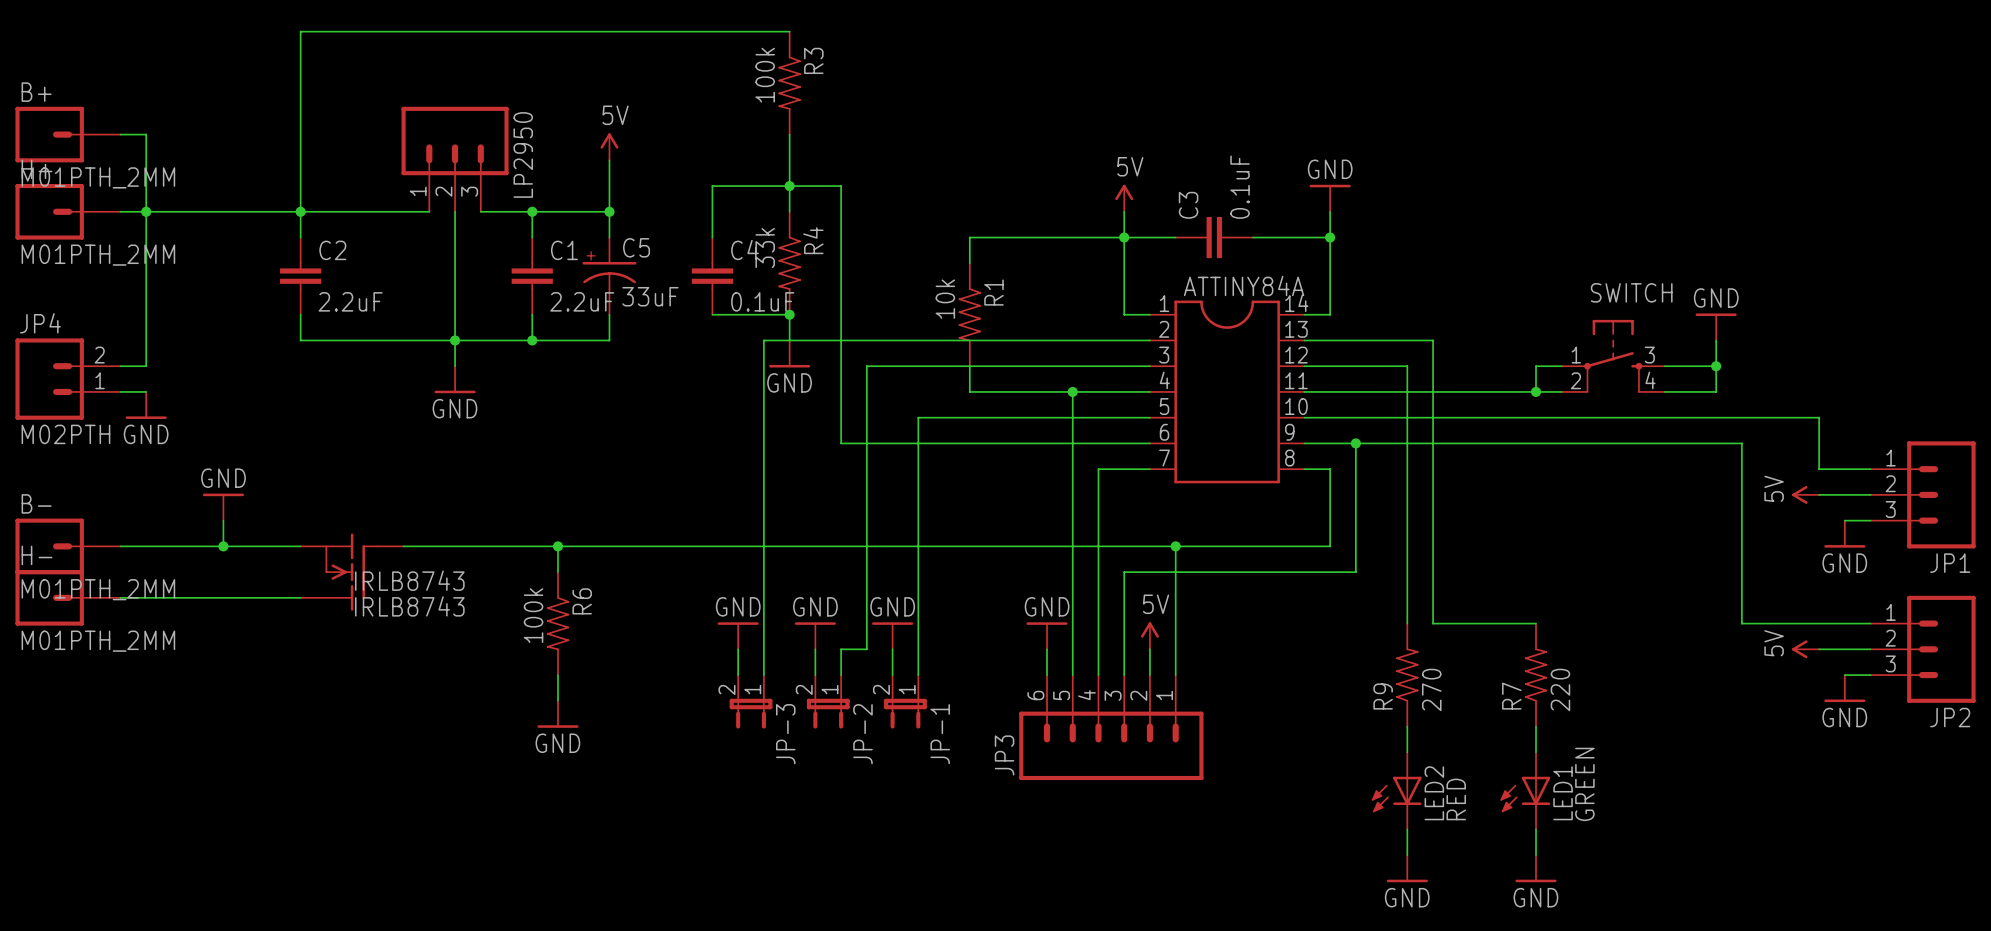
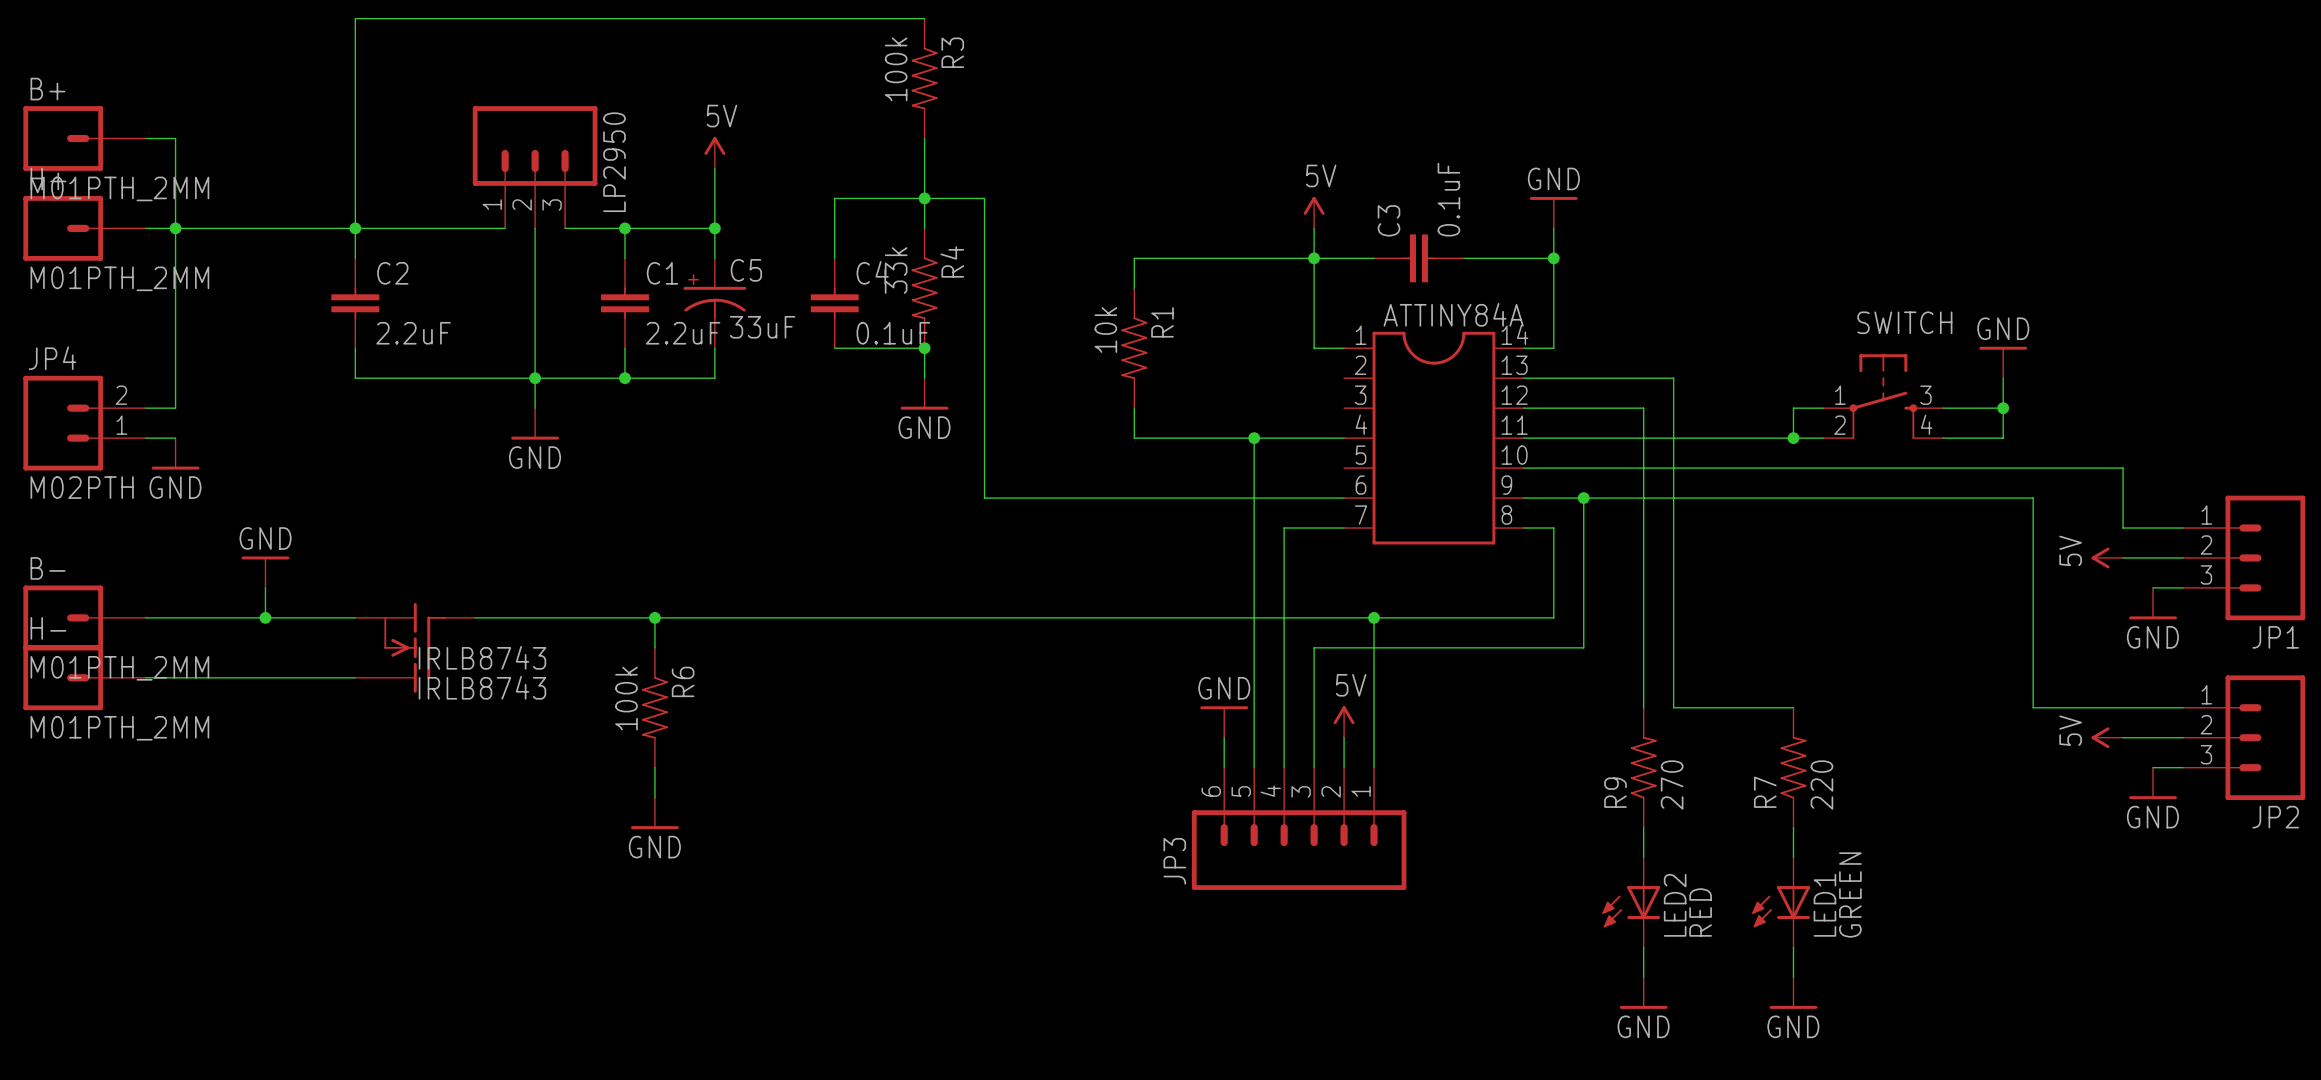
wire: (1149, 340) (763, 340) (763, 675) -> none
wire: (1149, 366) (866, 366) (866, 649) (841, 649) (841, 675) -> none
wire: (1149, 417) (918, 417) (918, 675) -> none
power symbol: GND (738, 635) -> none
power symbol: GND (815, 635) -> none
power symbol: GND (892, 635) -> none
wire: (738, 649) (738, 675) -> none
wire: (815, 649) (815, 675) -> none
wire: (892, 649) (892, 675) -> none
JP-3: (751, 701) -> none
JP-2: (828, 701) -> none
JP-1: (905, 701) -> none

